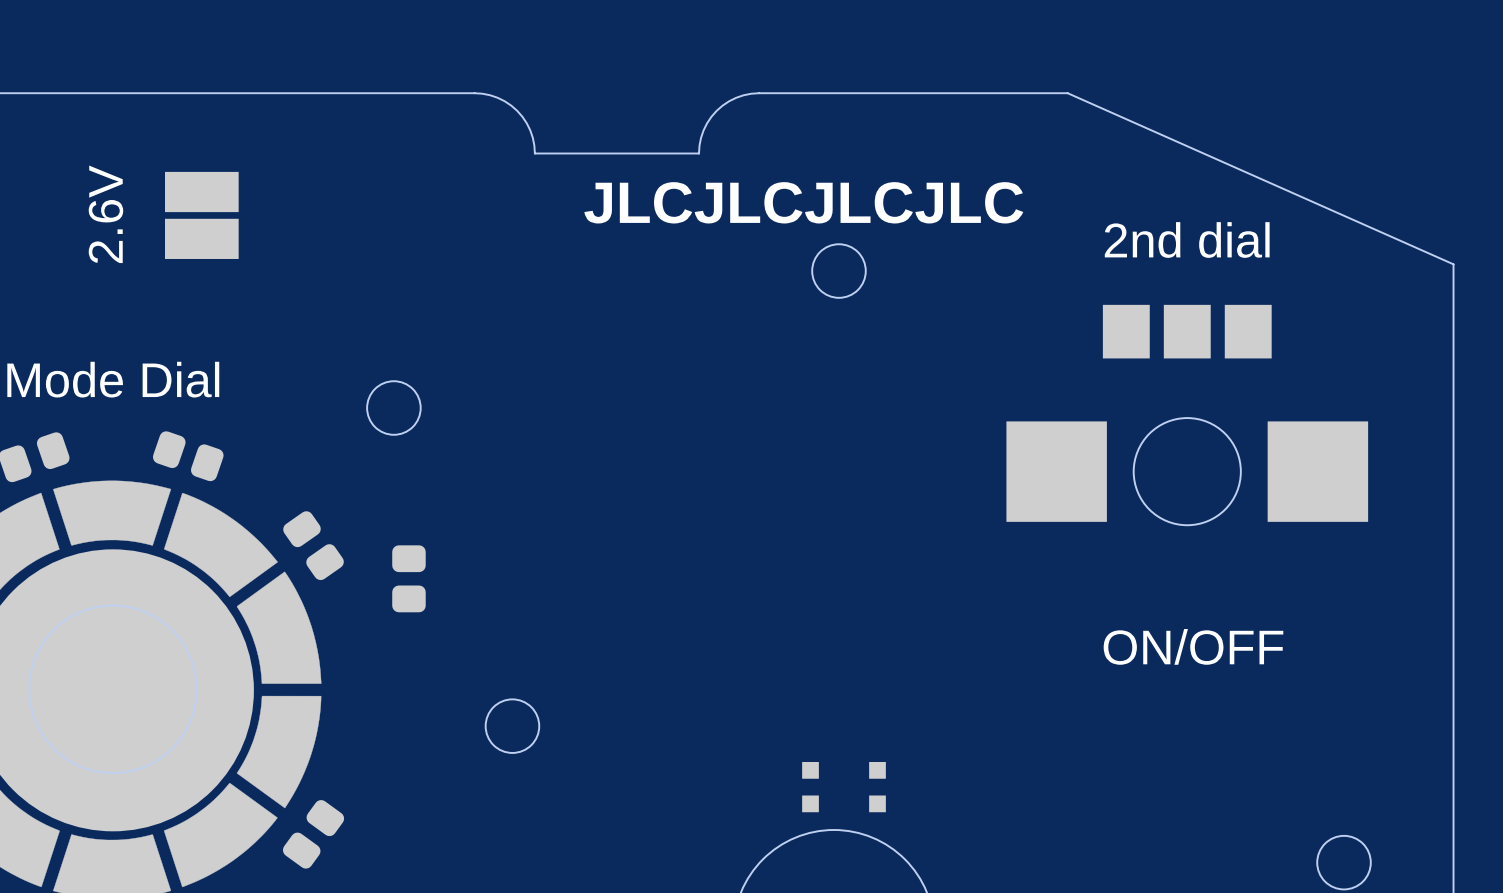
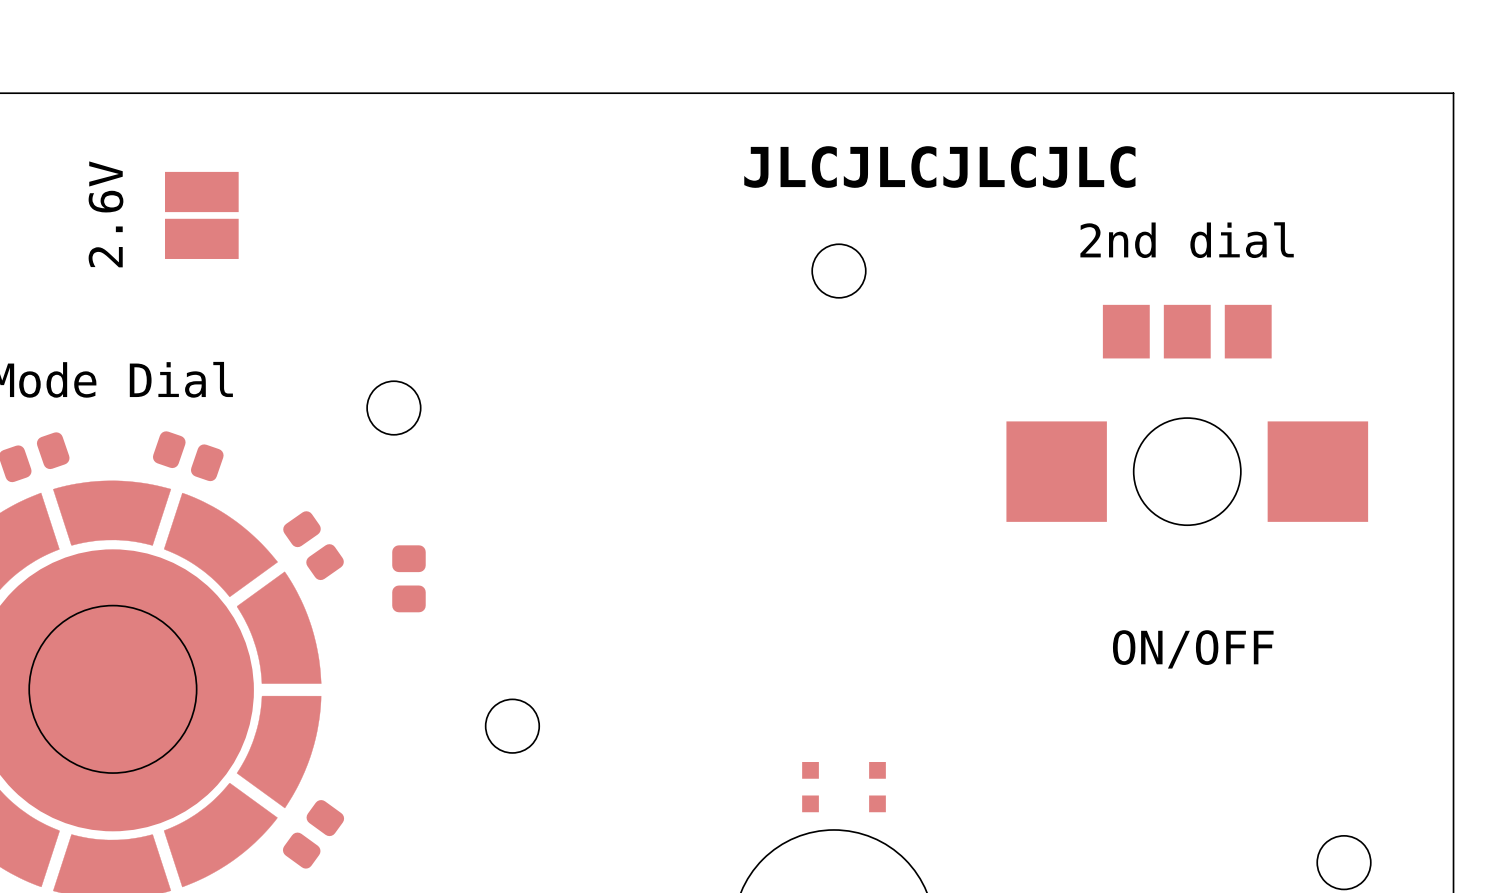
board edge: (474, 93) (497, 97) (517, 110) (530, 130) (534, 153) (698, 153) (703, 130) (716, 110) (736, 97) (759, 93) -> (474, 93) (759, 93)
board edge: (1067, 93) (1453, 264) -> (1067, 93) (1453, 93) (1453, 264)
text position: JLCJLCJLCJLC (803, 202) -> JLCJLCJLCJLC (939, 167)

